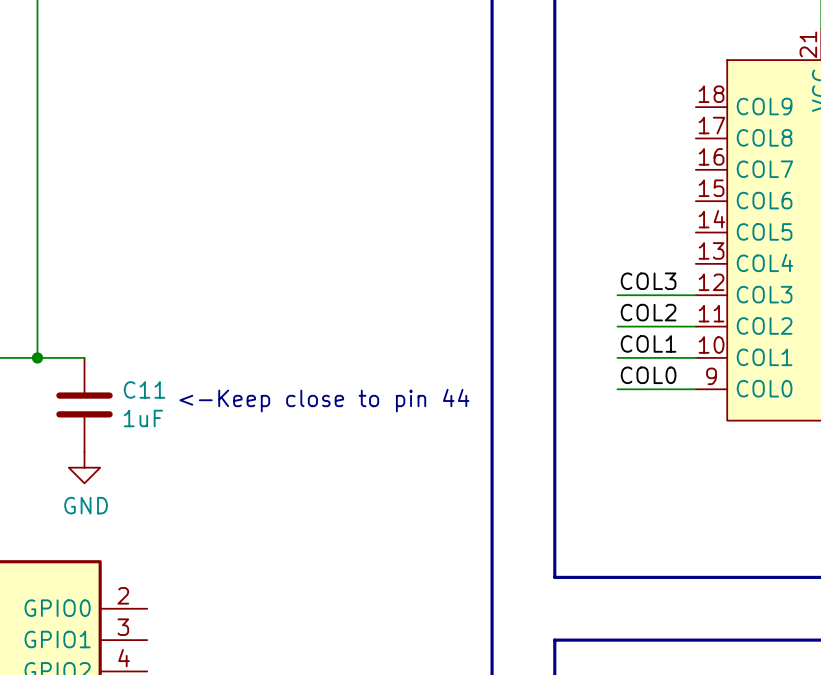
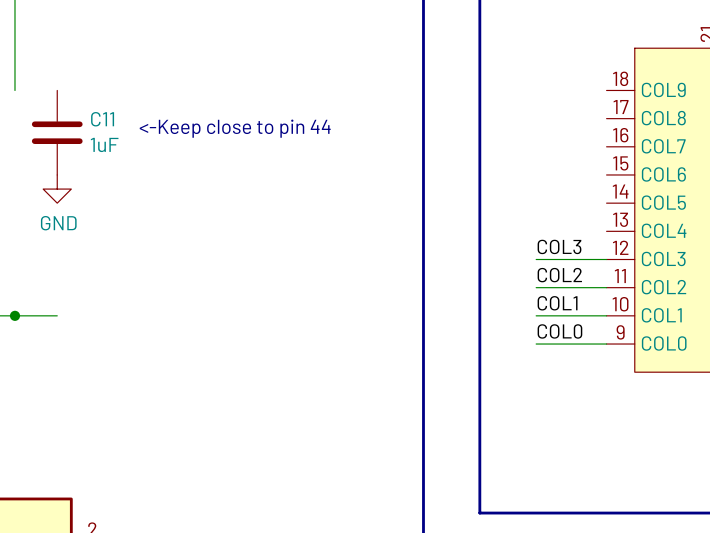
wire: (37, 107) (37, 357) -> none
power symbol: none -> GND (57, 189)
text position: <-Keep close to pin 44 (324, 400) -> <-Keep close to pin 44 (235, 128)
C11 position: (84, 404) -> (57, 132)
power symbol: GND (84, 467) -> none

